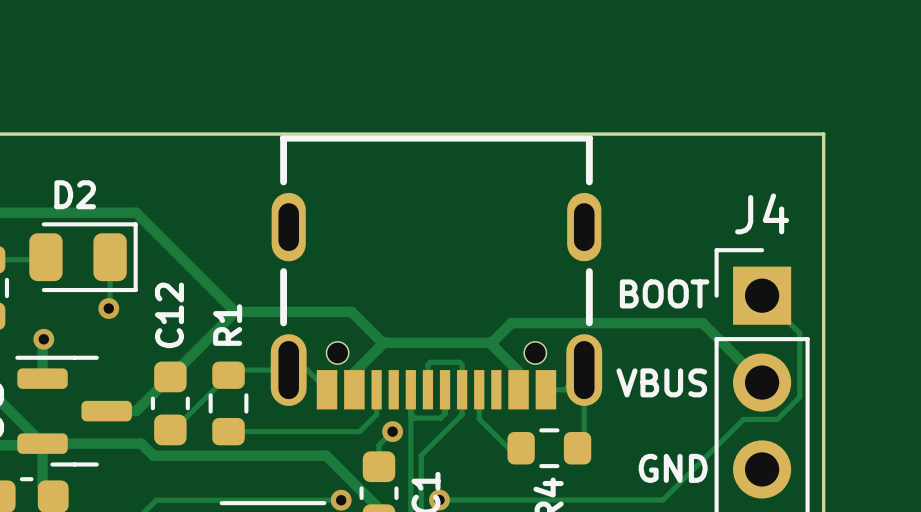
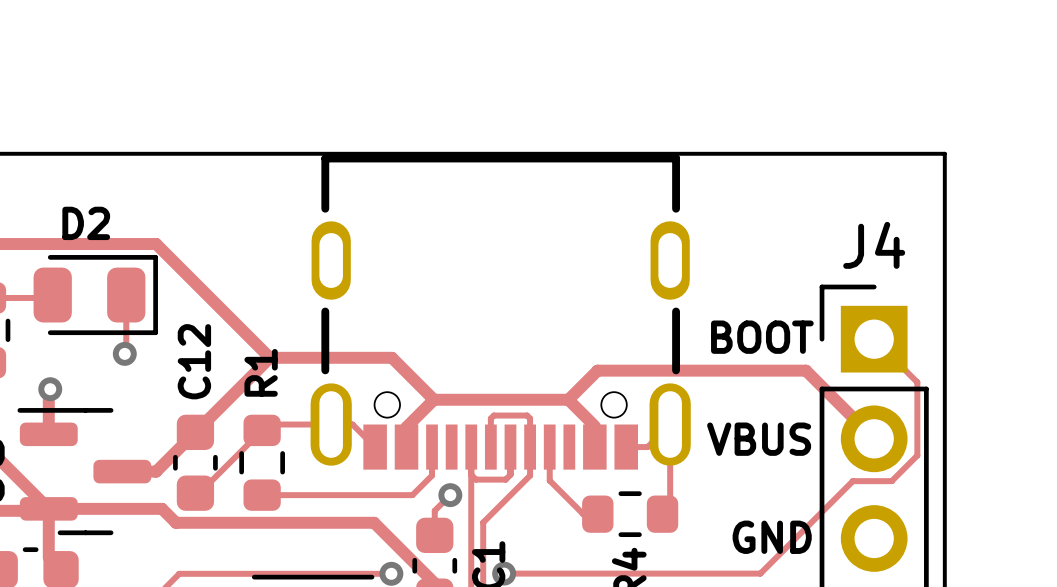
track: (341, 311) (351, 311) (382, 342) (489, 342) (495, 348) -> (391, 357) (433, 399) (568, 399) (597, 370)
track: (520, 323) (511, 323) (491, 344) -> none

